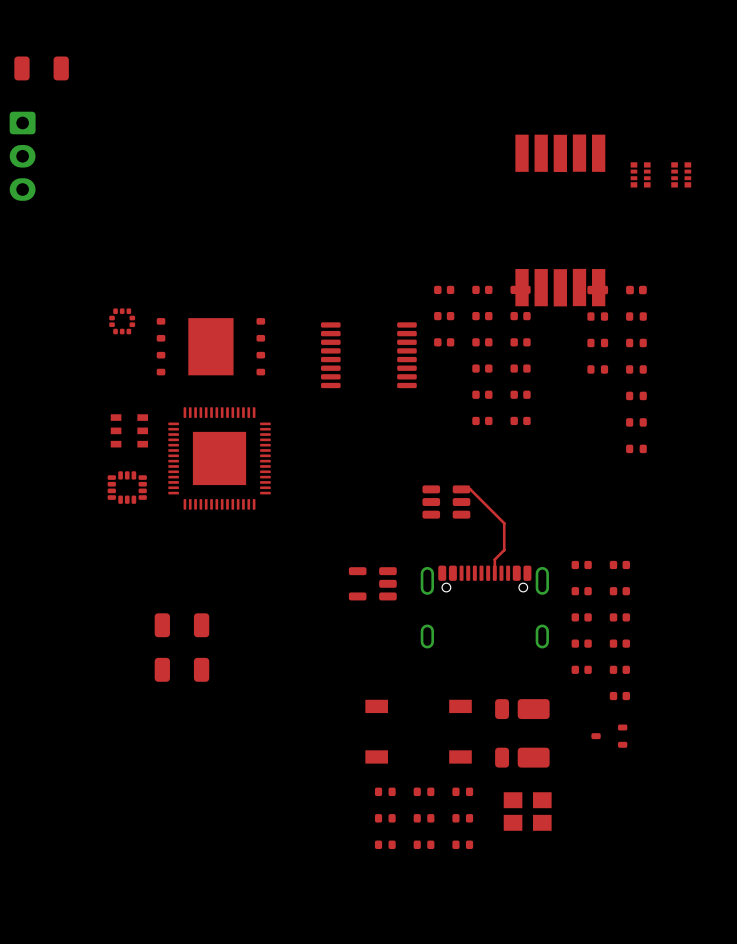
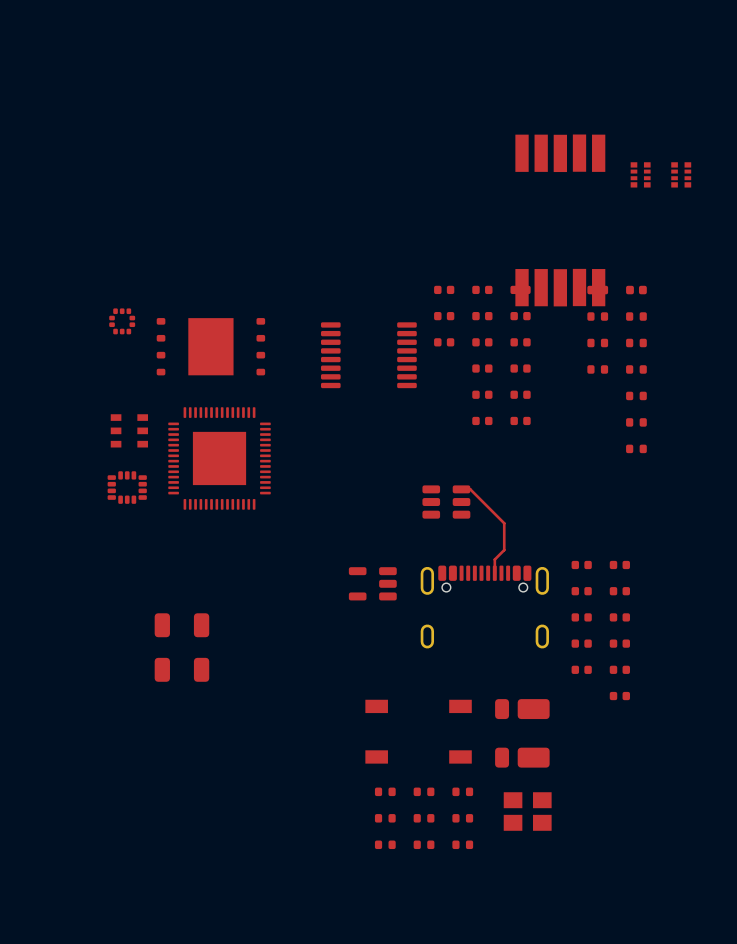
part: (41, 68) -> none
part: (22, 156) -> none
part: (609, 736) -> none

